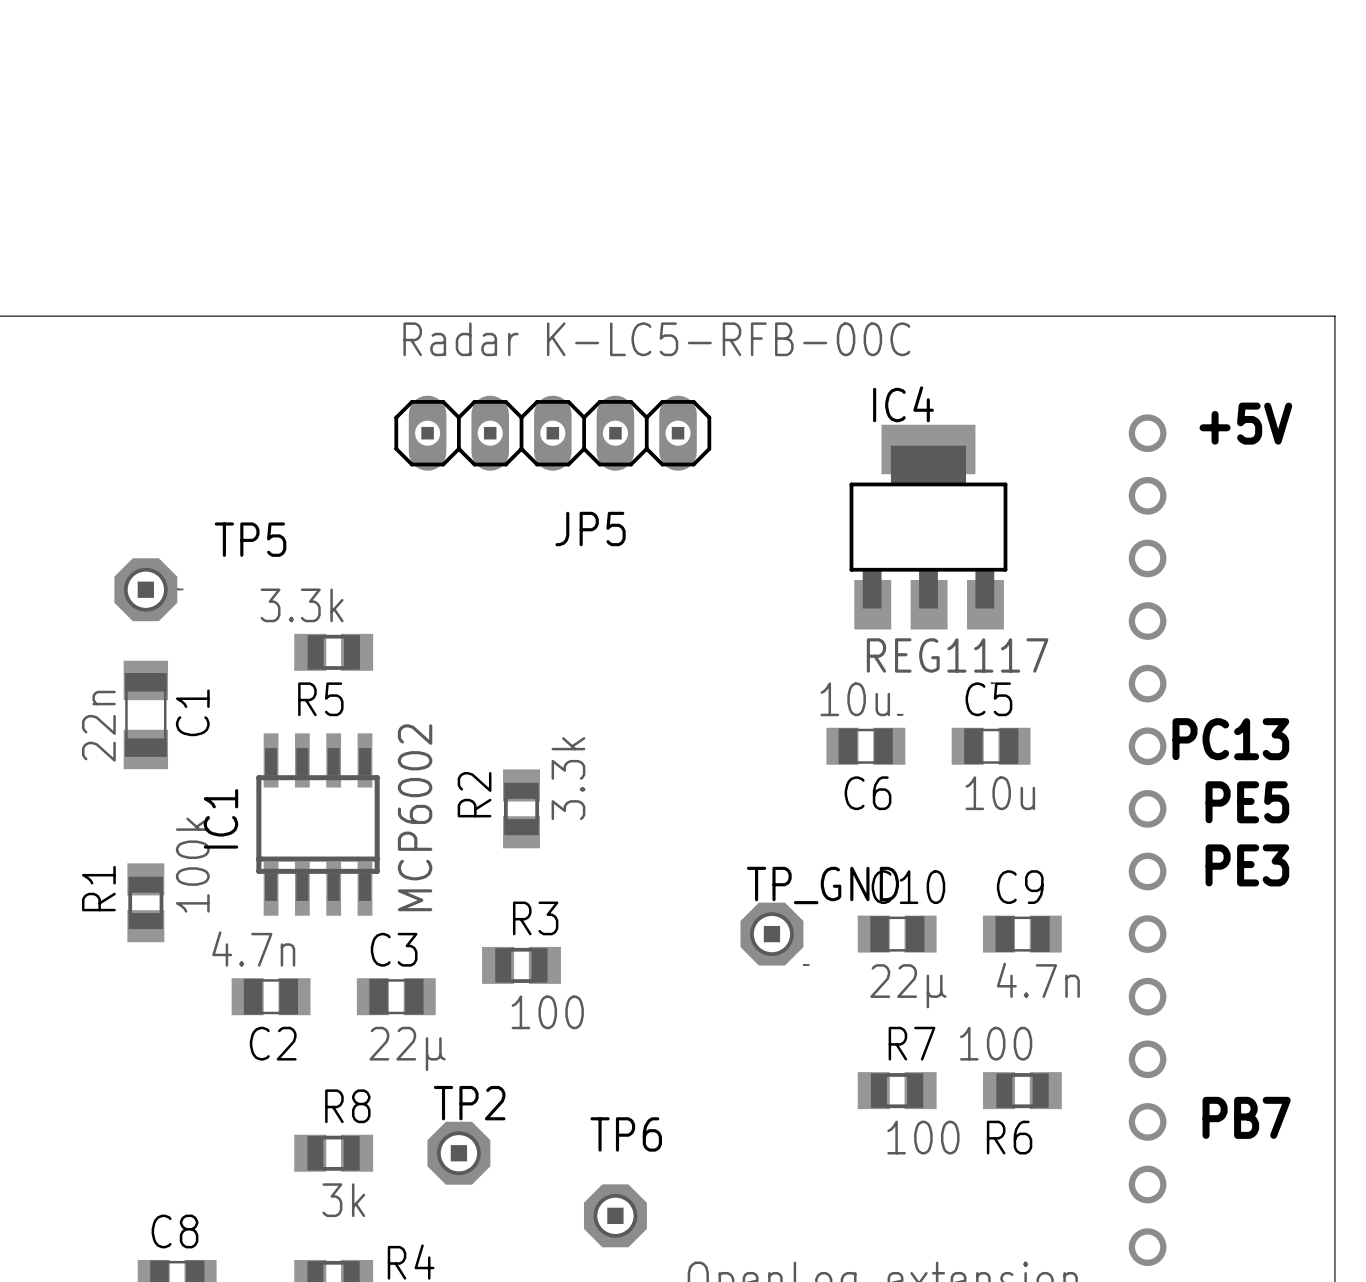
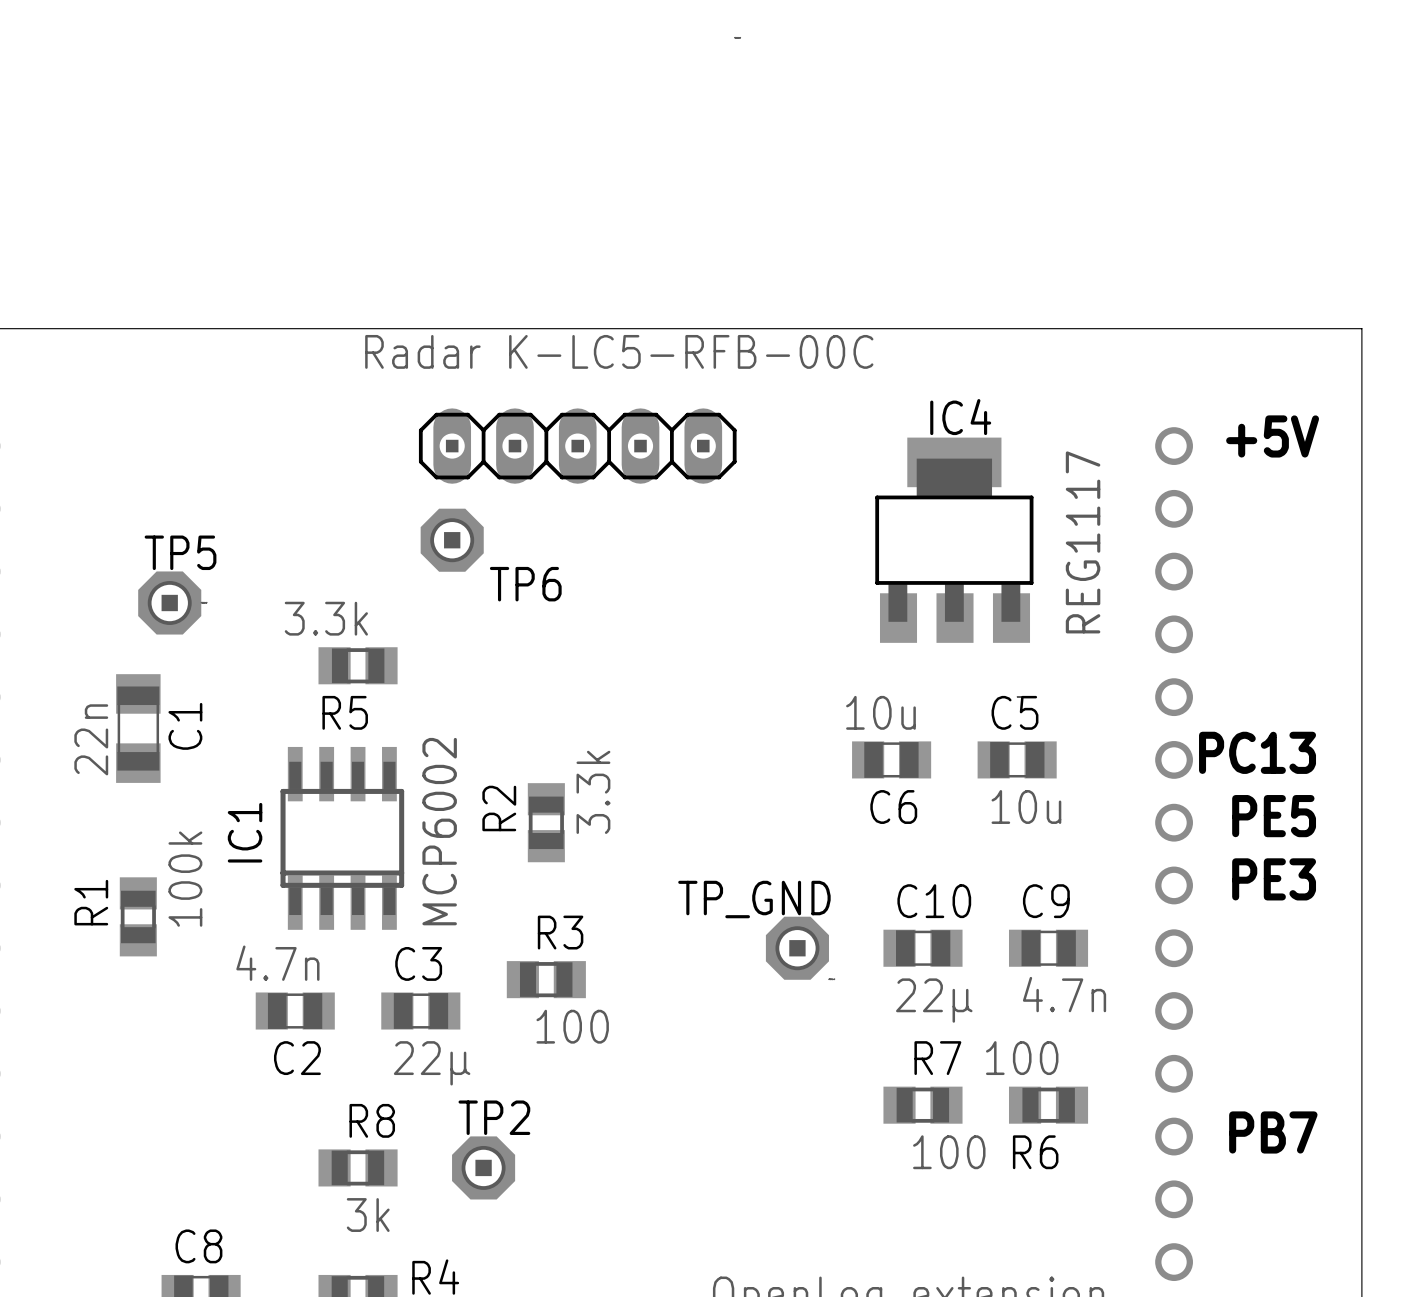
JP5 value position: Radar K-LC5-RFB-00C (656, 339) -> Radar K-LC5-RFB-00C (619, 351)
IC4 name position: IC4 (903, 404) -> IC4 (960, 417)
JP5 name: JP5 (590, 529) -> none
TP5 name position: TP5 (250, 539) -> TP5 (180, 552)
IC4 value rotation: 0° (957, 655) -> 90° counterclockwise (1083, 542)
C1 position: (145, 714) -> (138, 728)
TP_GND name position: TP_GND (822, 885) -> TP_GND (754, 899)
R1 position: (145, 902) -> (138, 916)
TP6 name position: TP6 (626, 1134) -> TP6 (525, 584)
TP6 position: (615, 1215) -> (452, 540)

